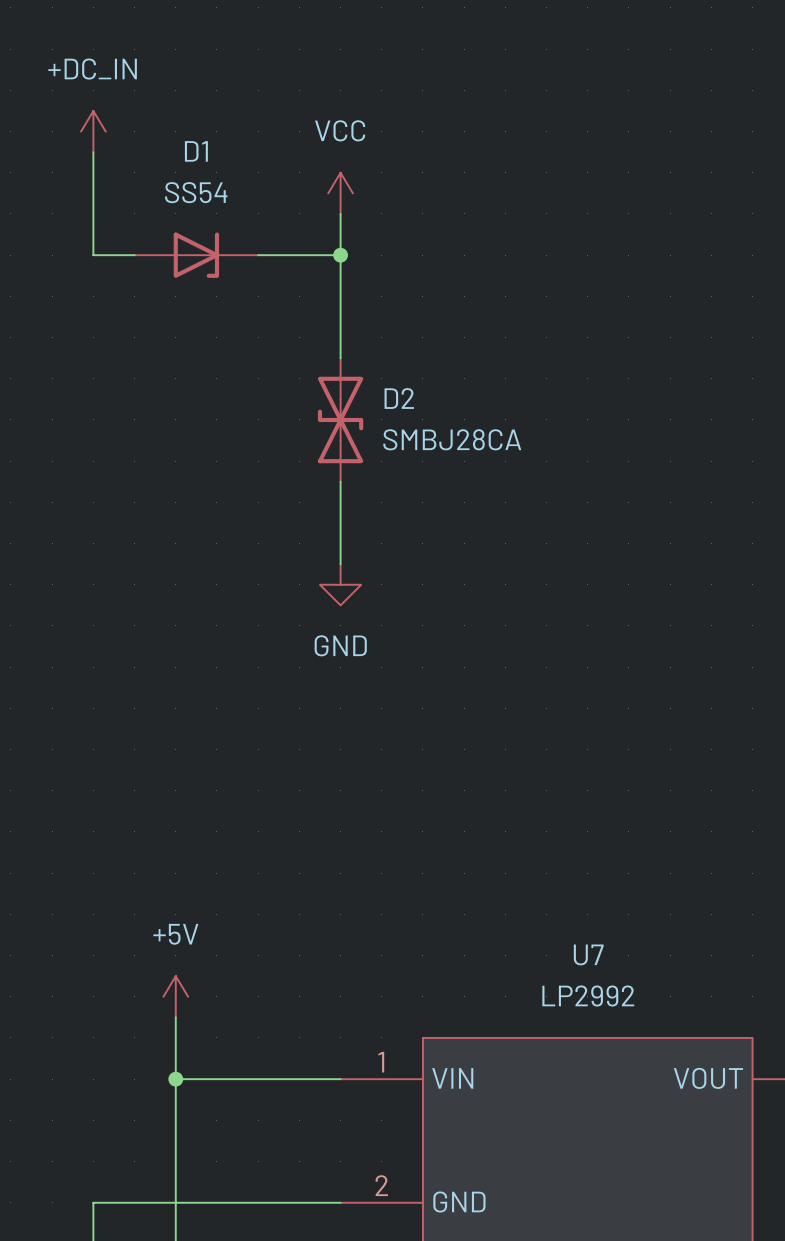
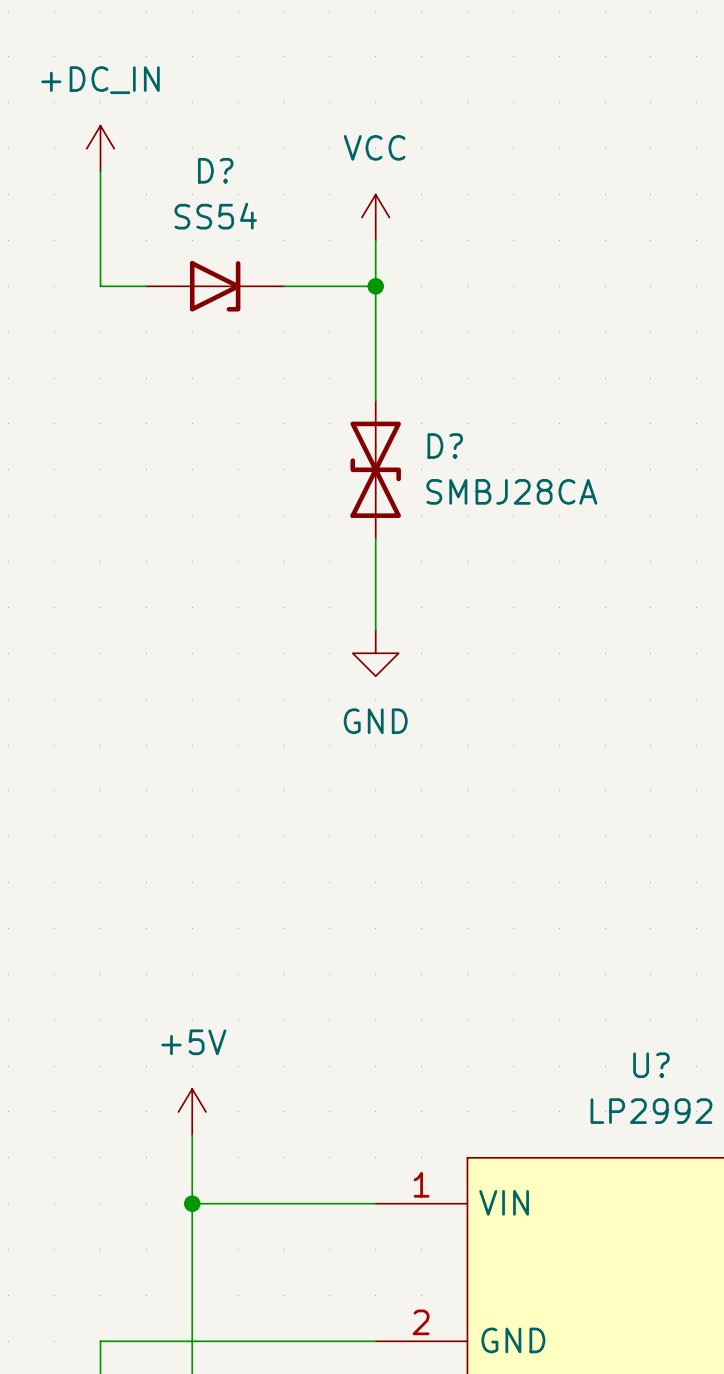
D1 name: D1 (196, 151) -> D? (215, 170)
D2 name: D2 (399, 398) -> D? (445, 446)
U7 name: U7 (588, 954) -> U? (651, 1065)

